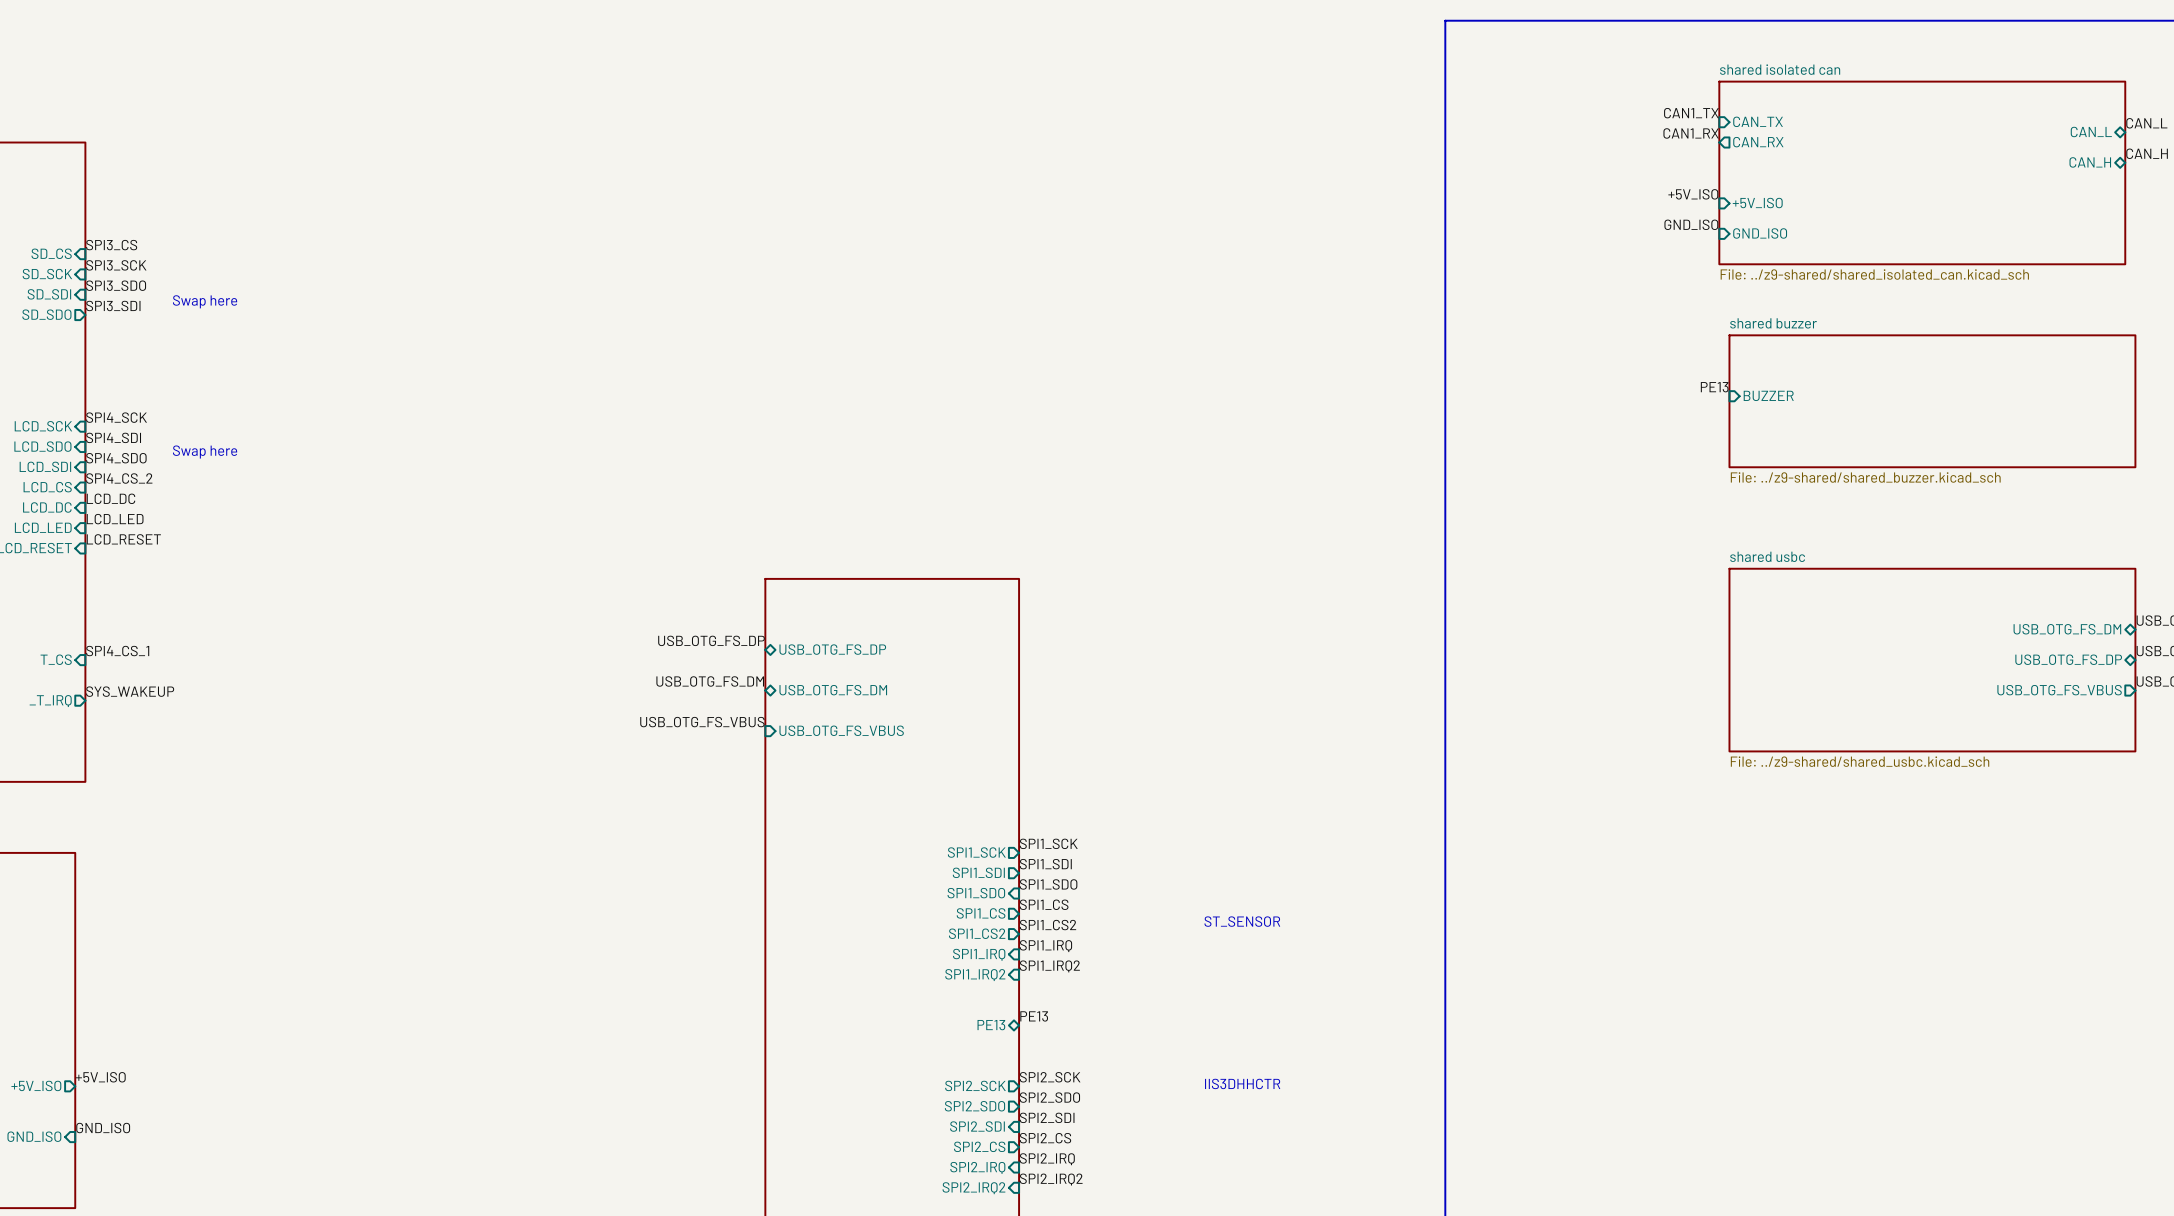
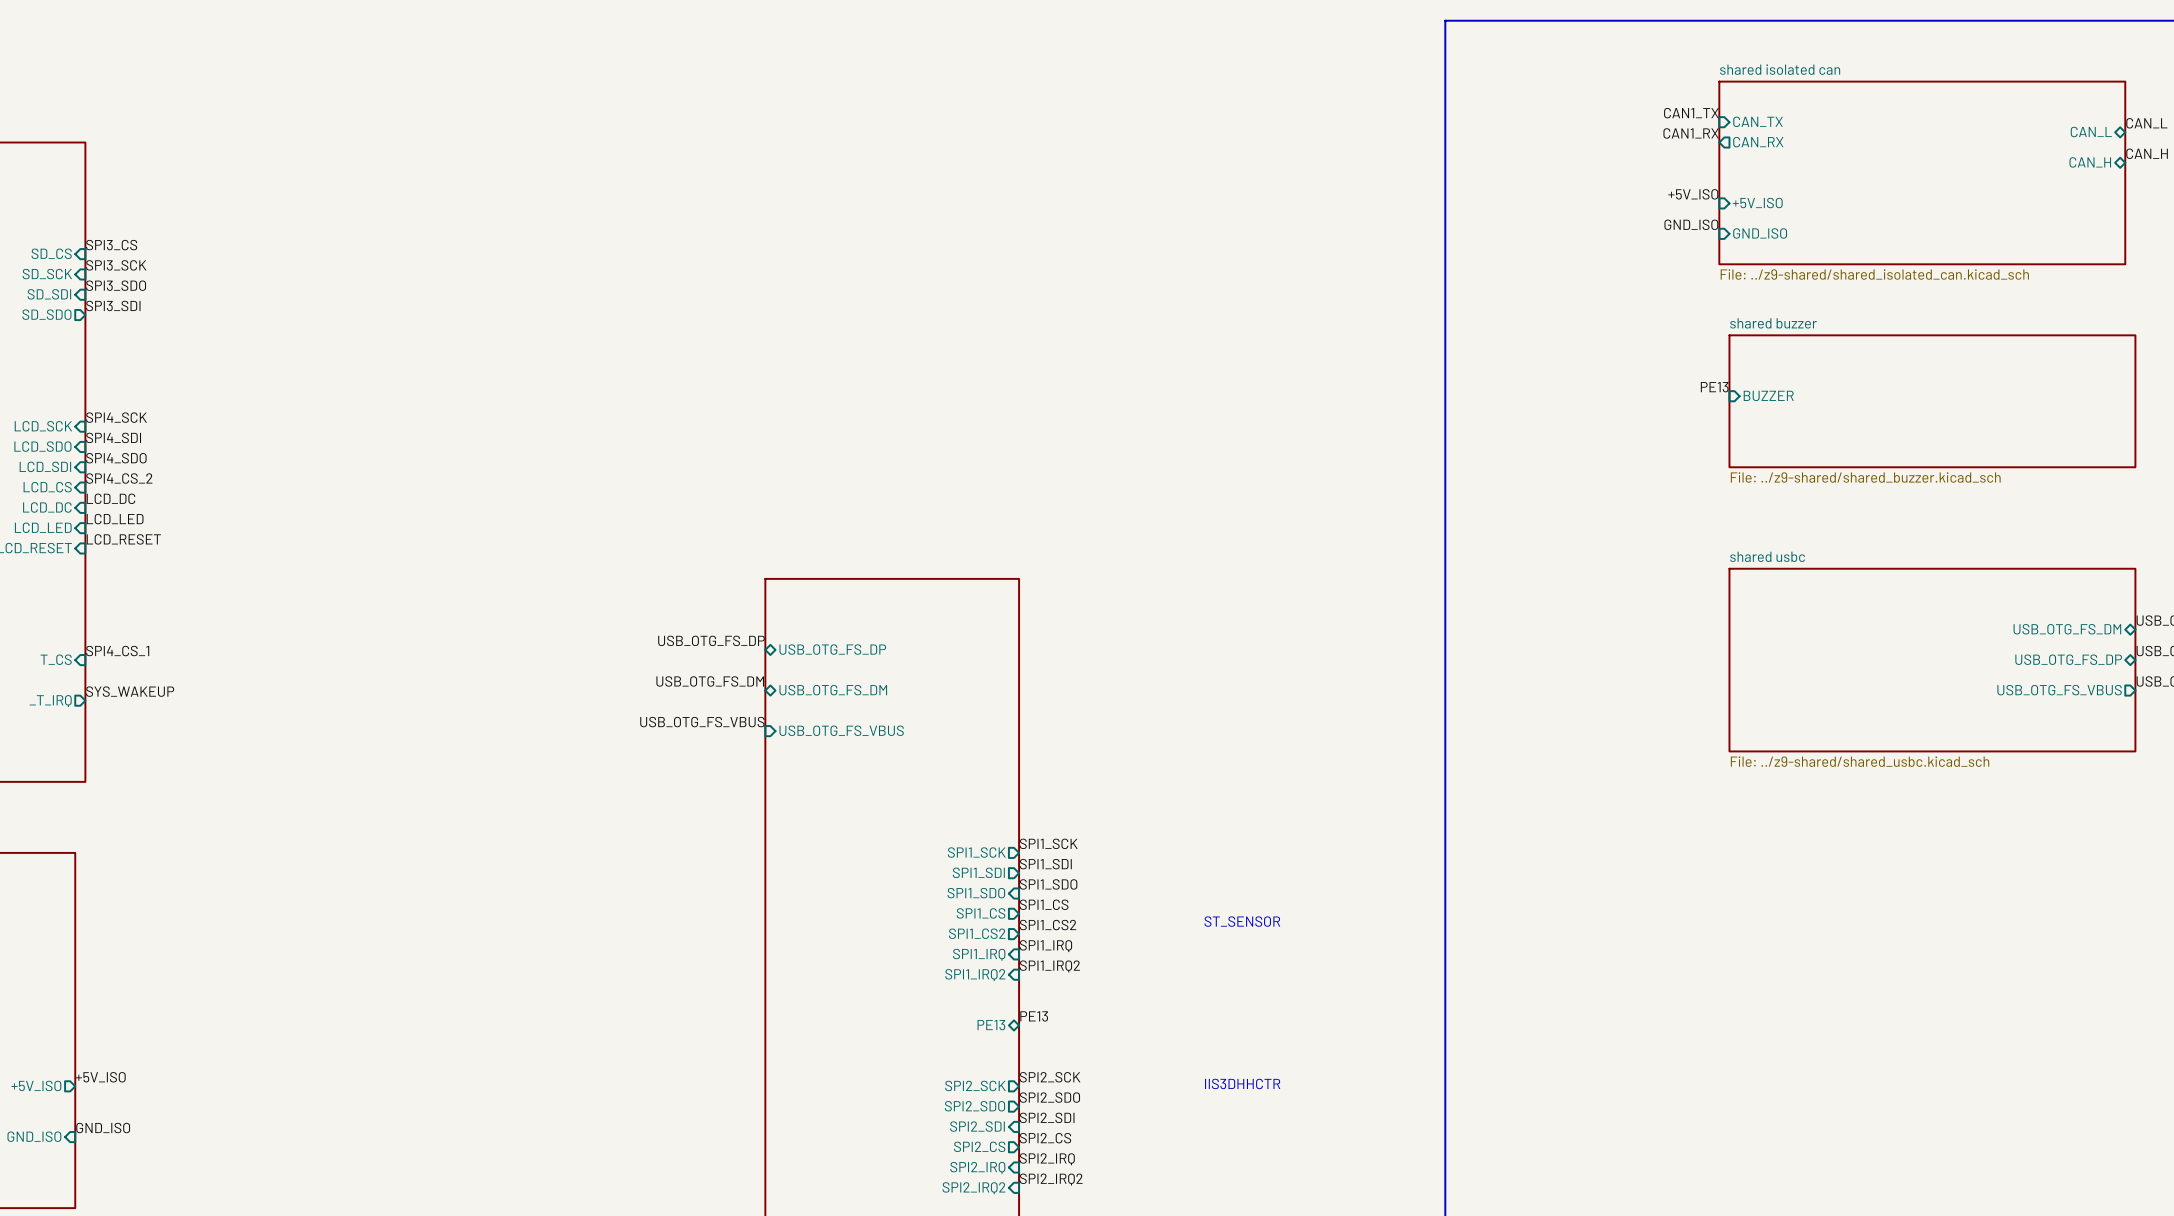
text: Swap here (205, 301) -> none
text: Swap here (205, 452) -> none

